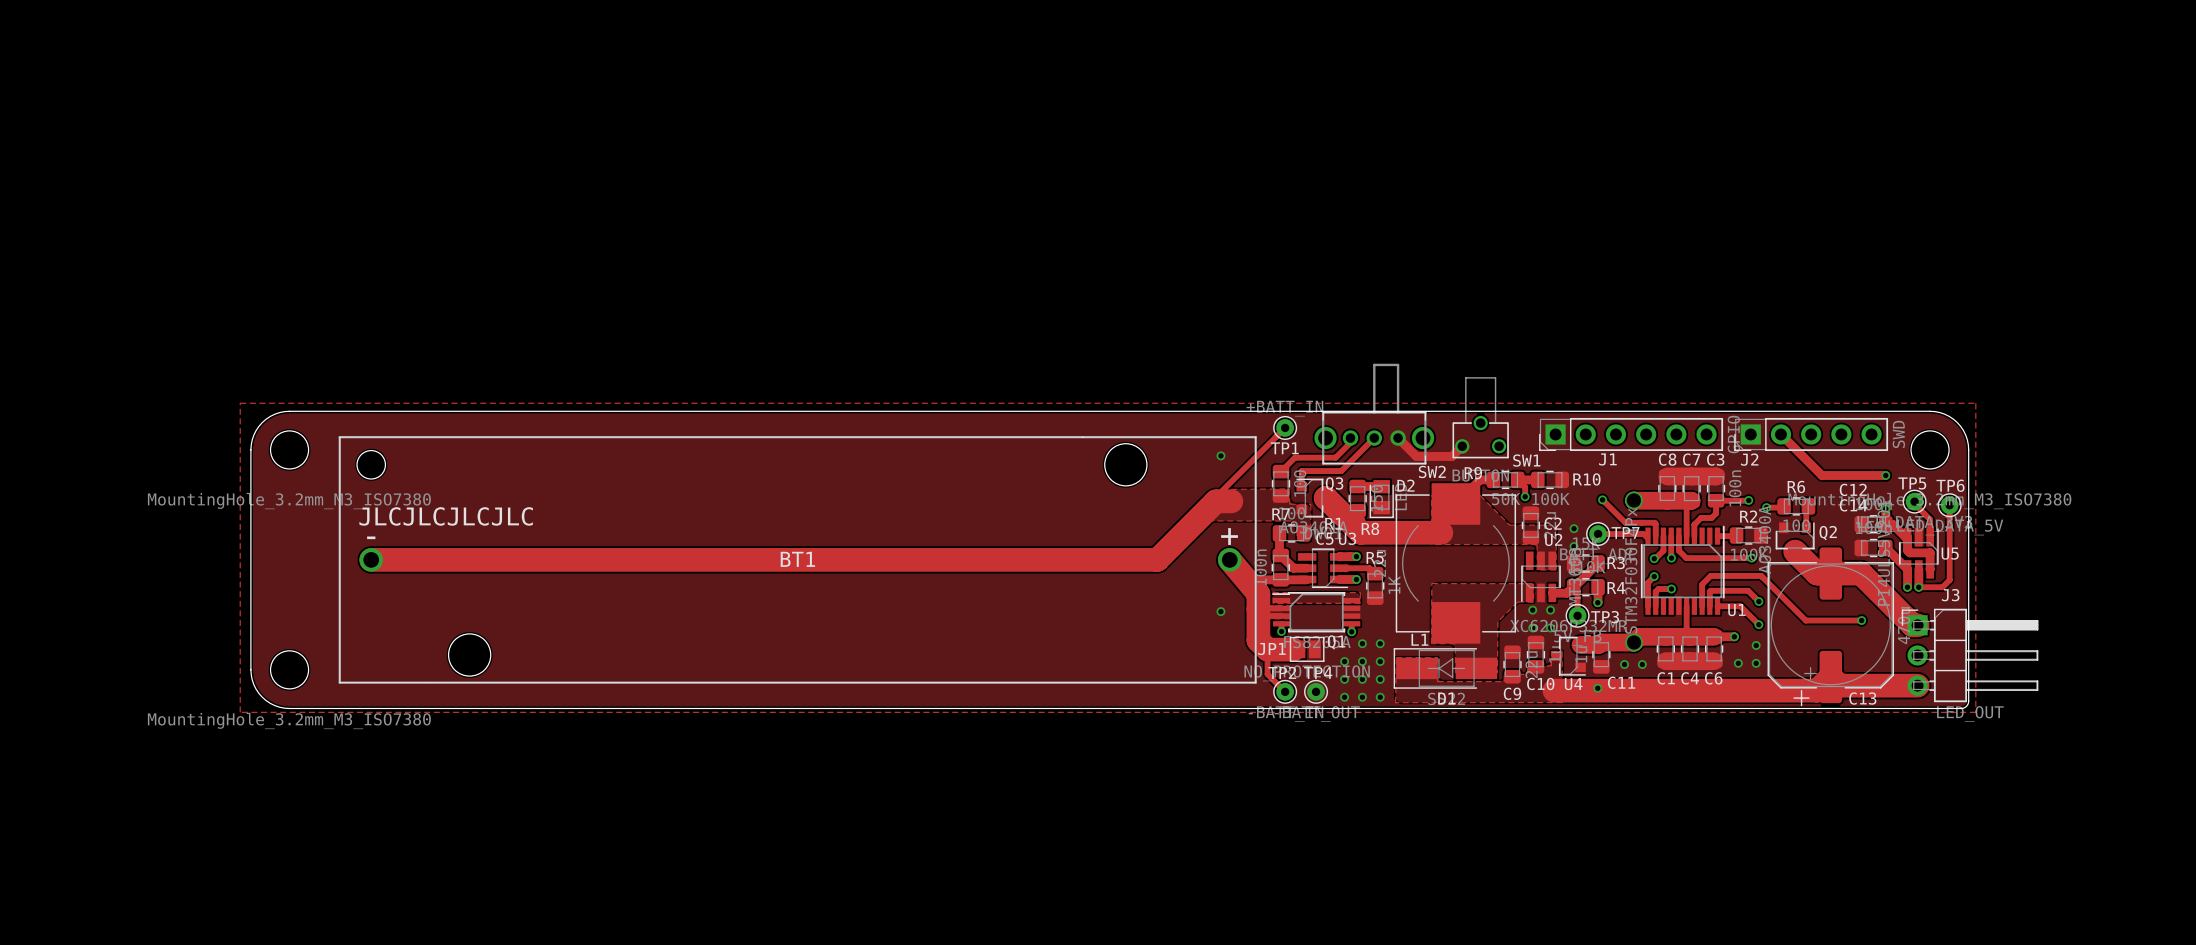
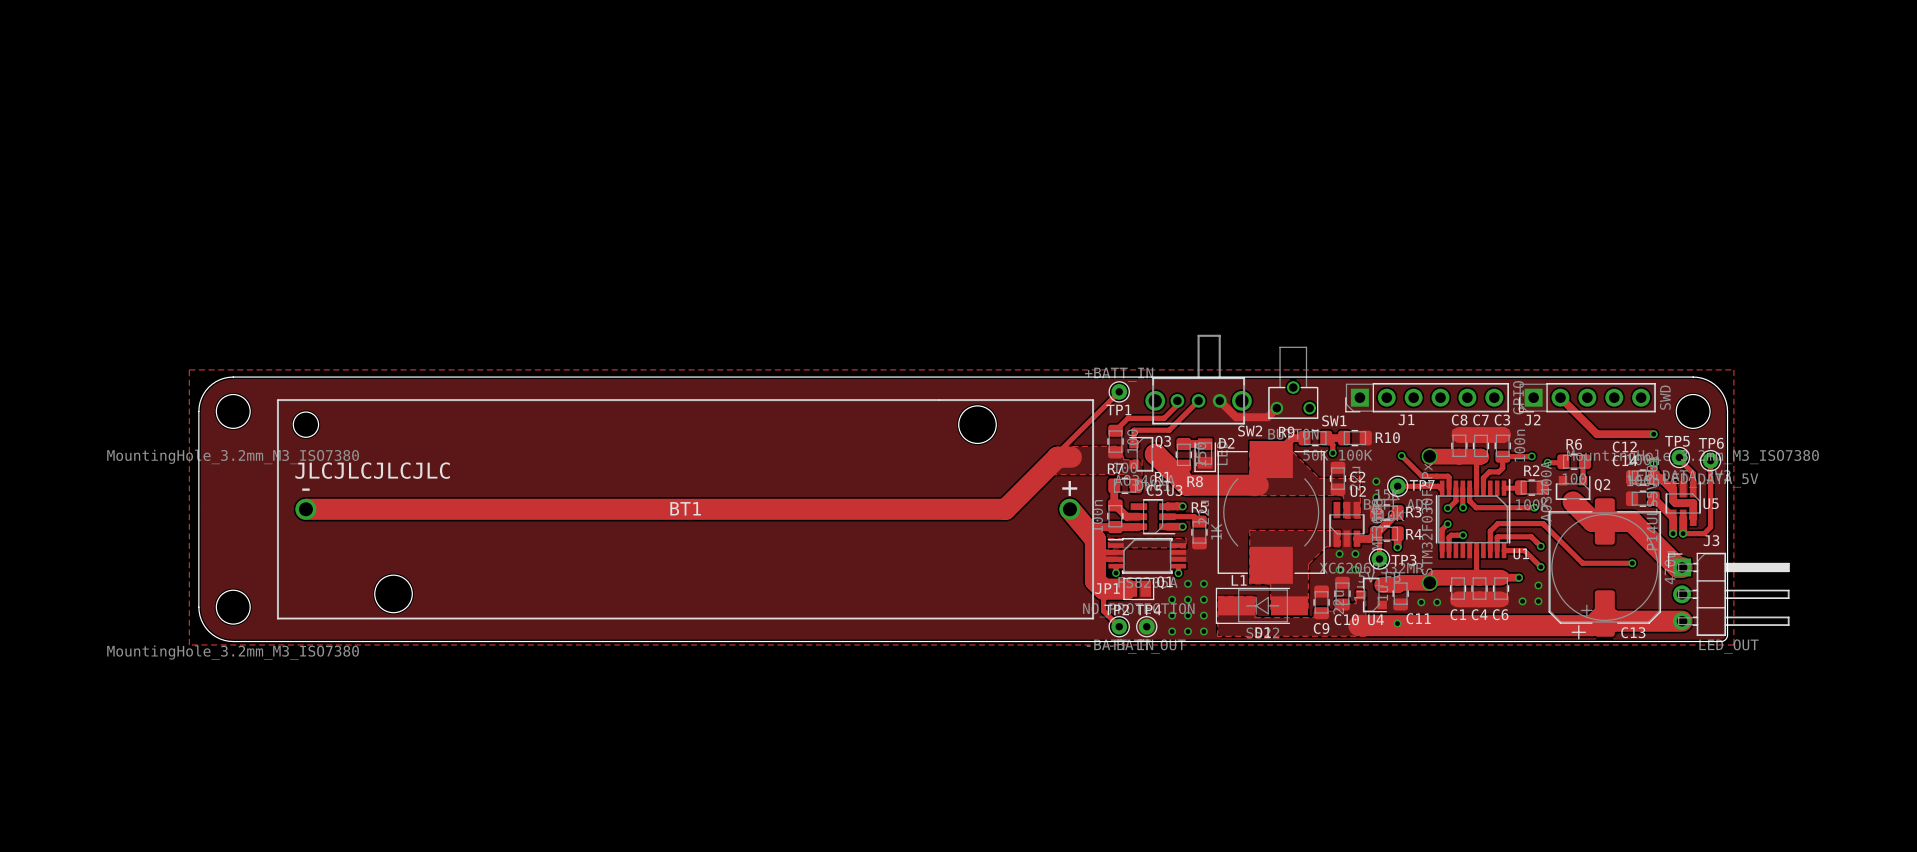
via: (1220, 455) -> none
via: (1220, 611) -> none

